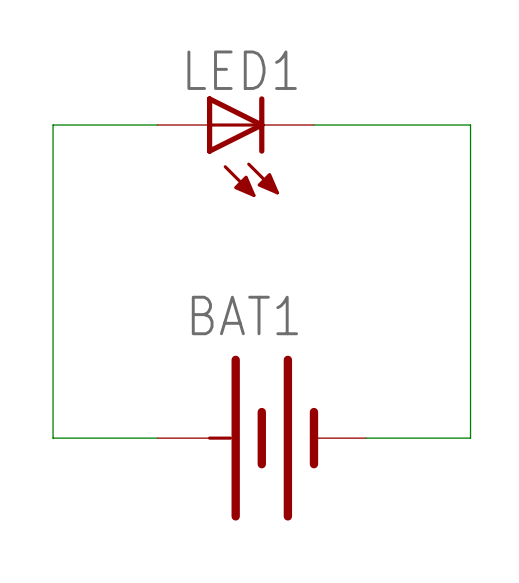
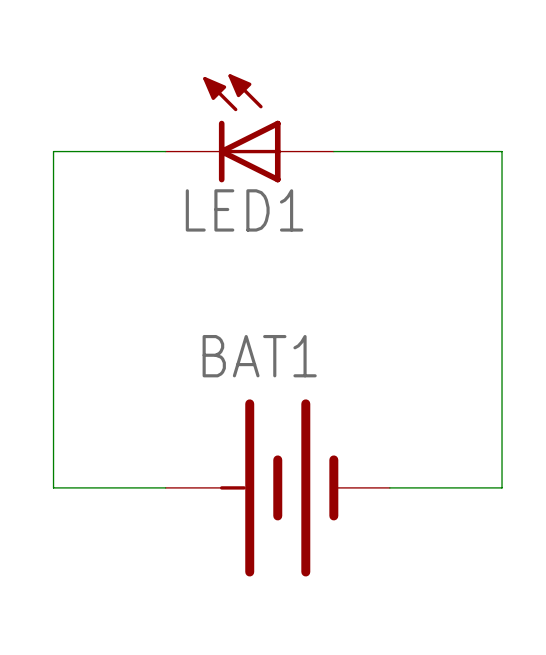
LED1 rotation: 0° (243, 146) -> 180° (241, 128)

